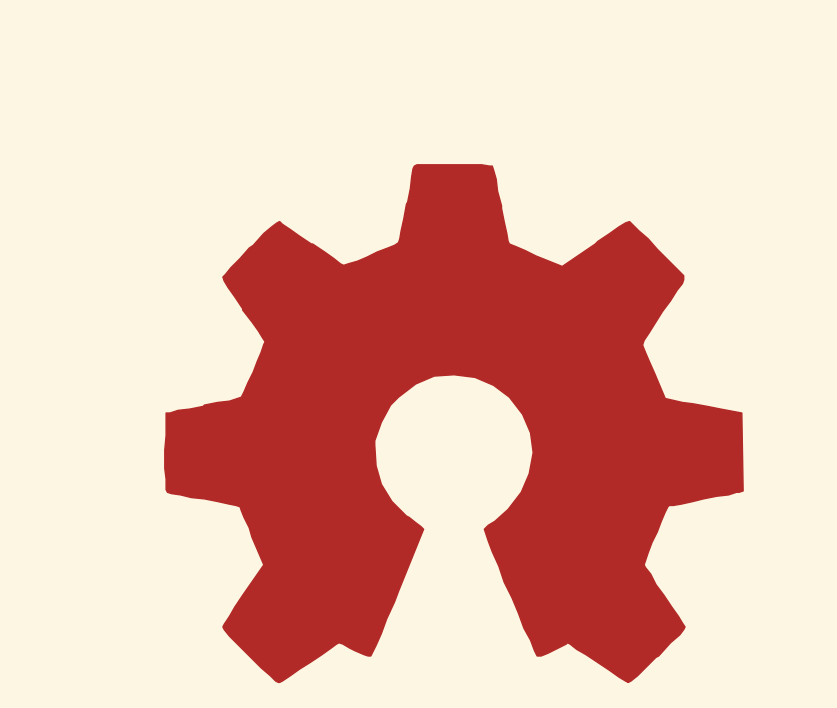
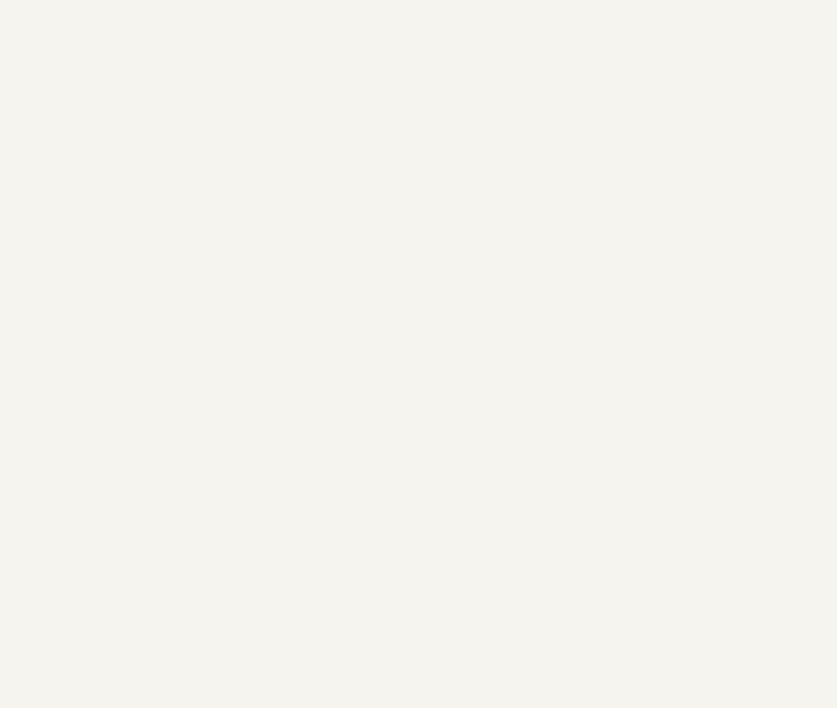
part: (453, 423) -> none

